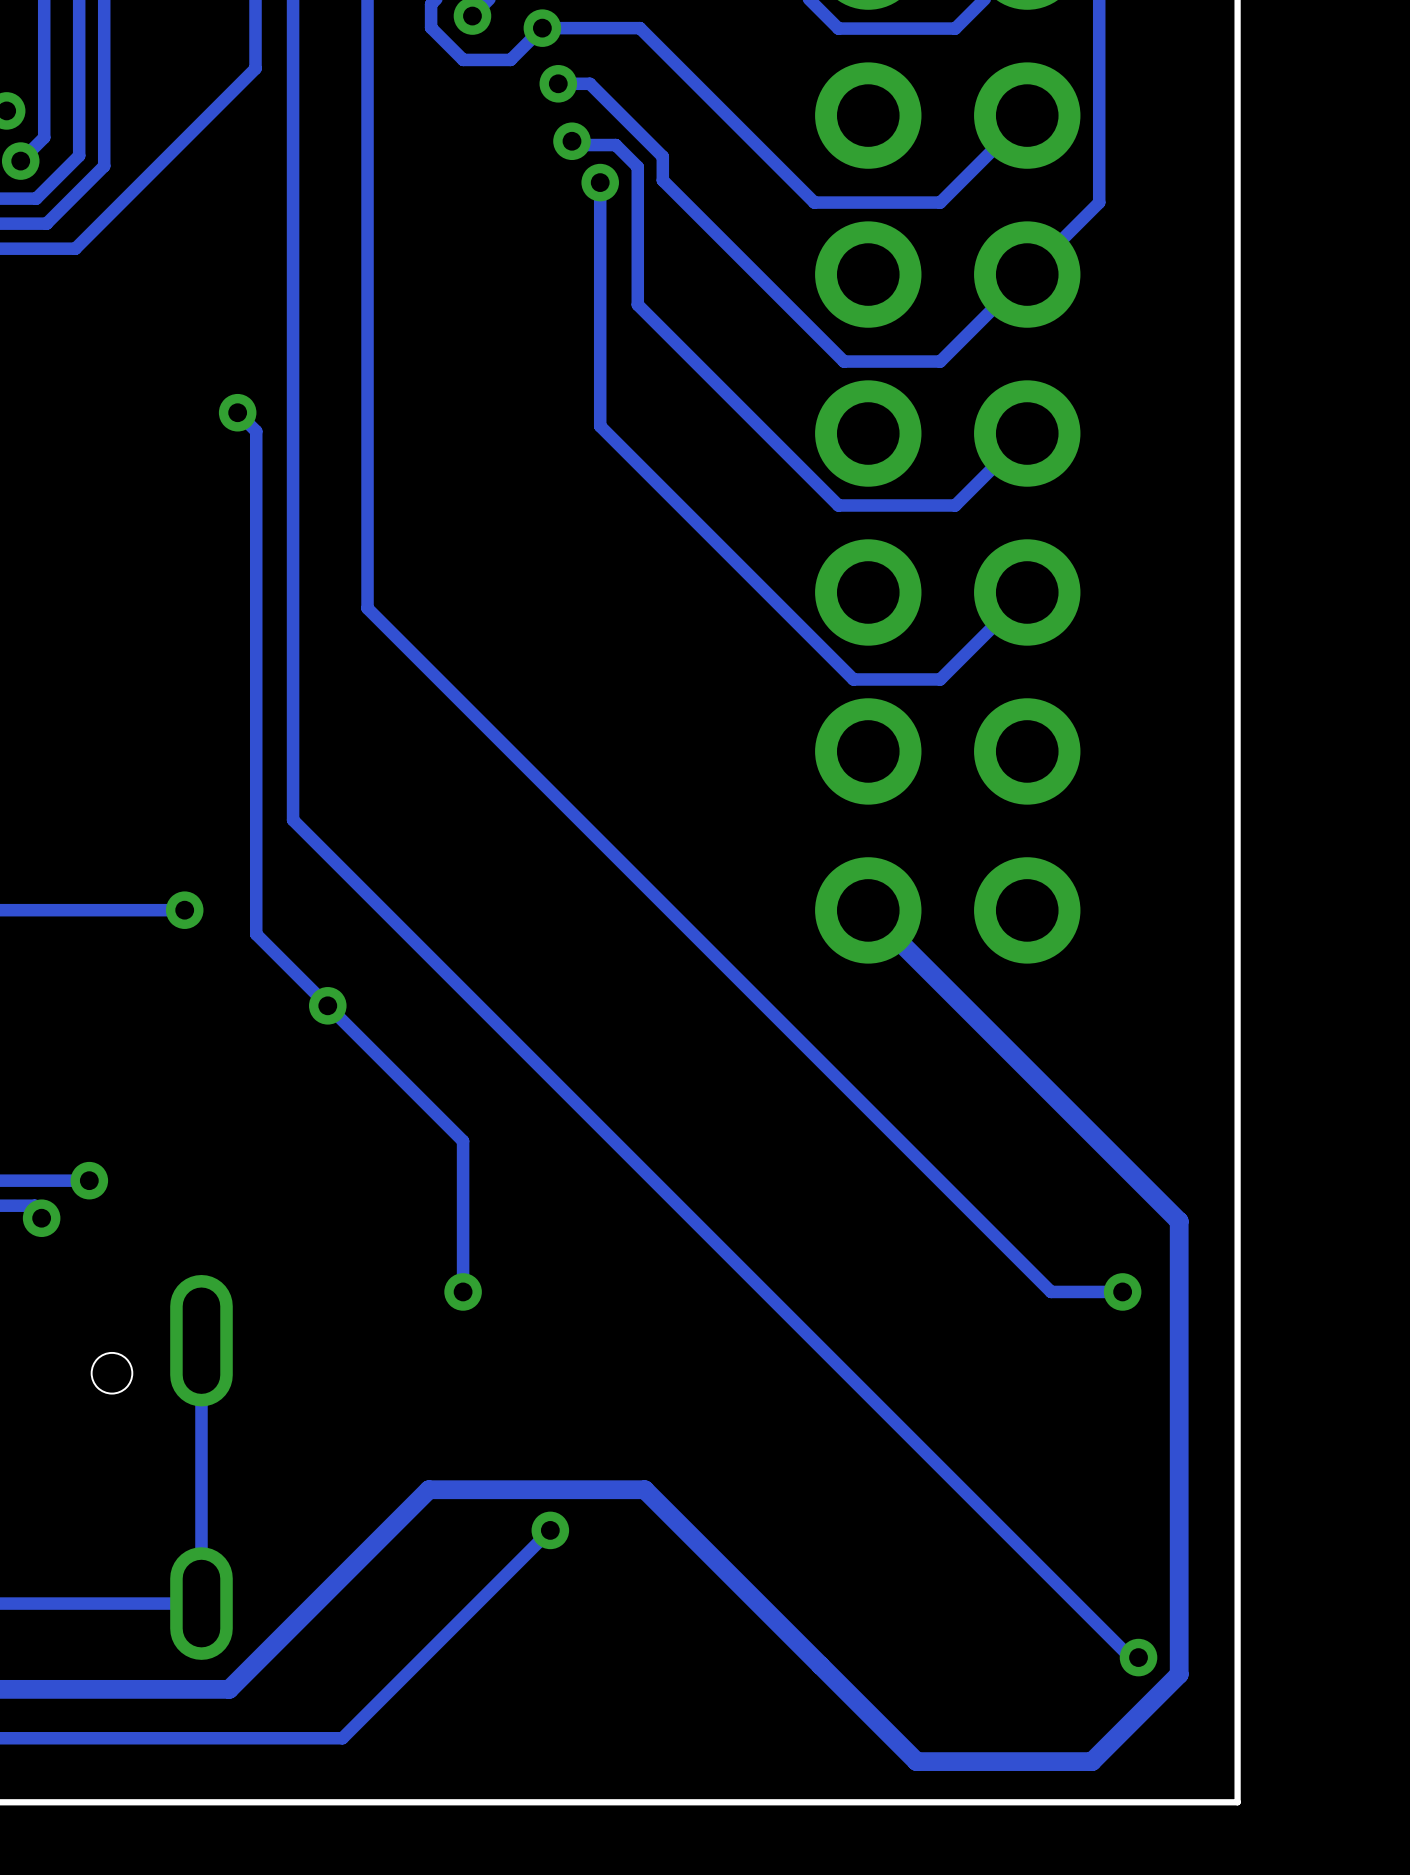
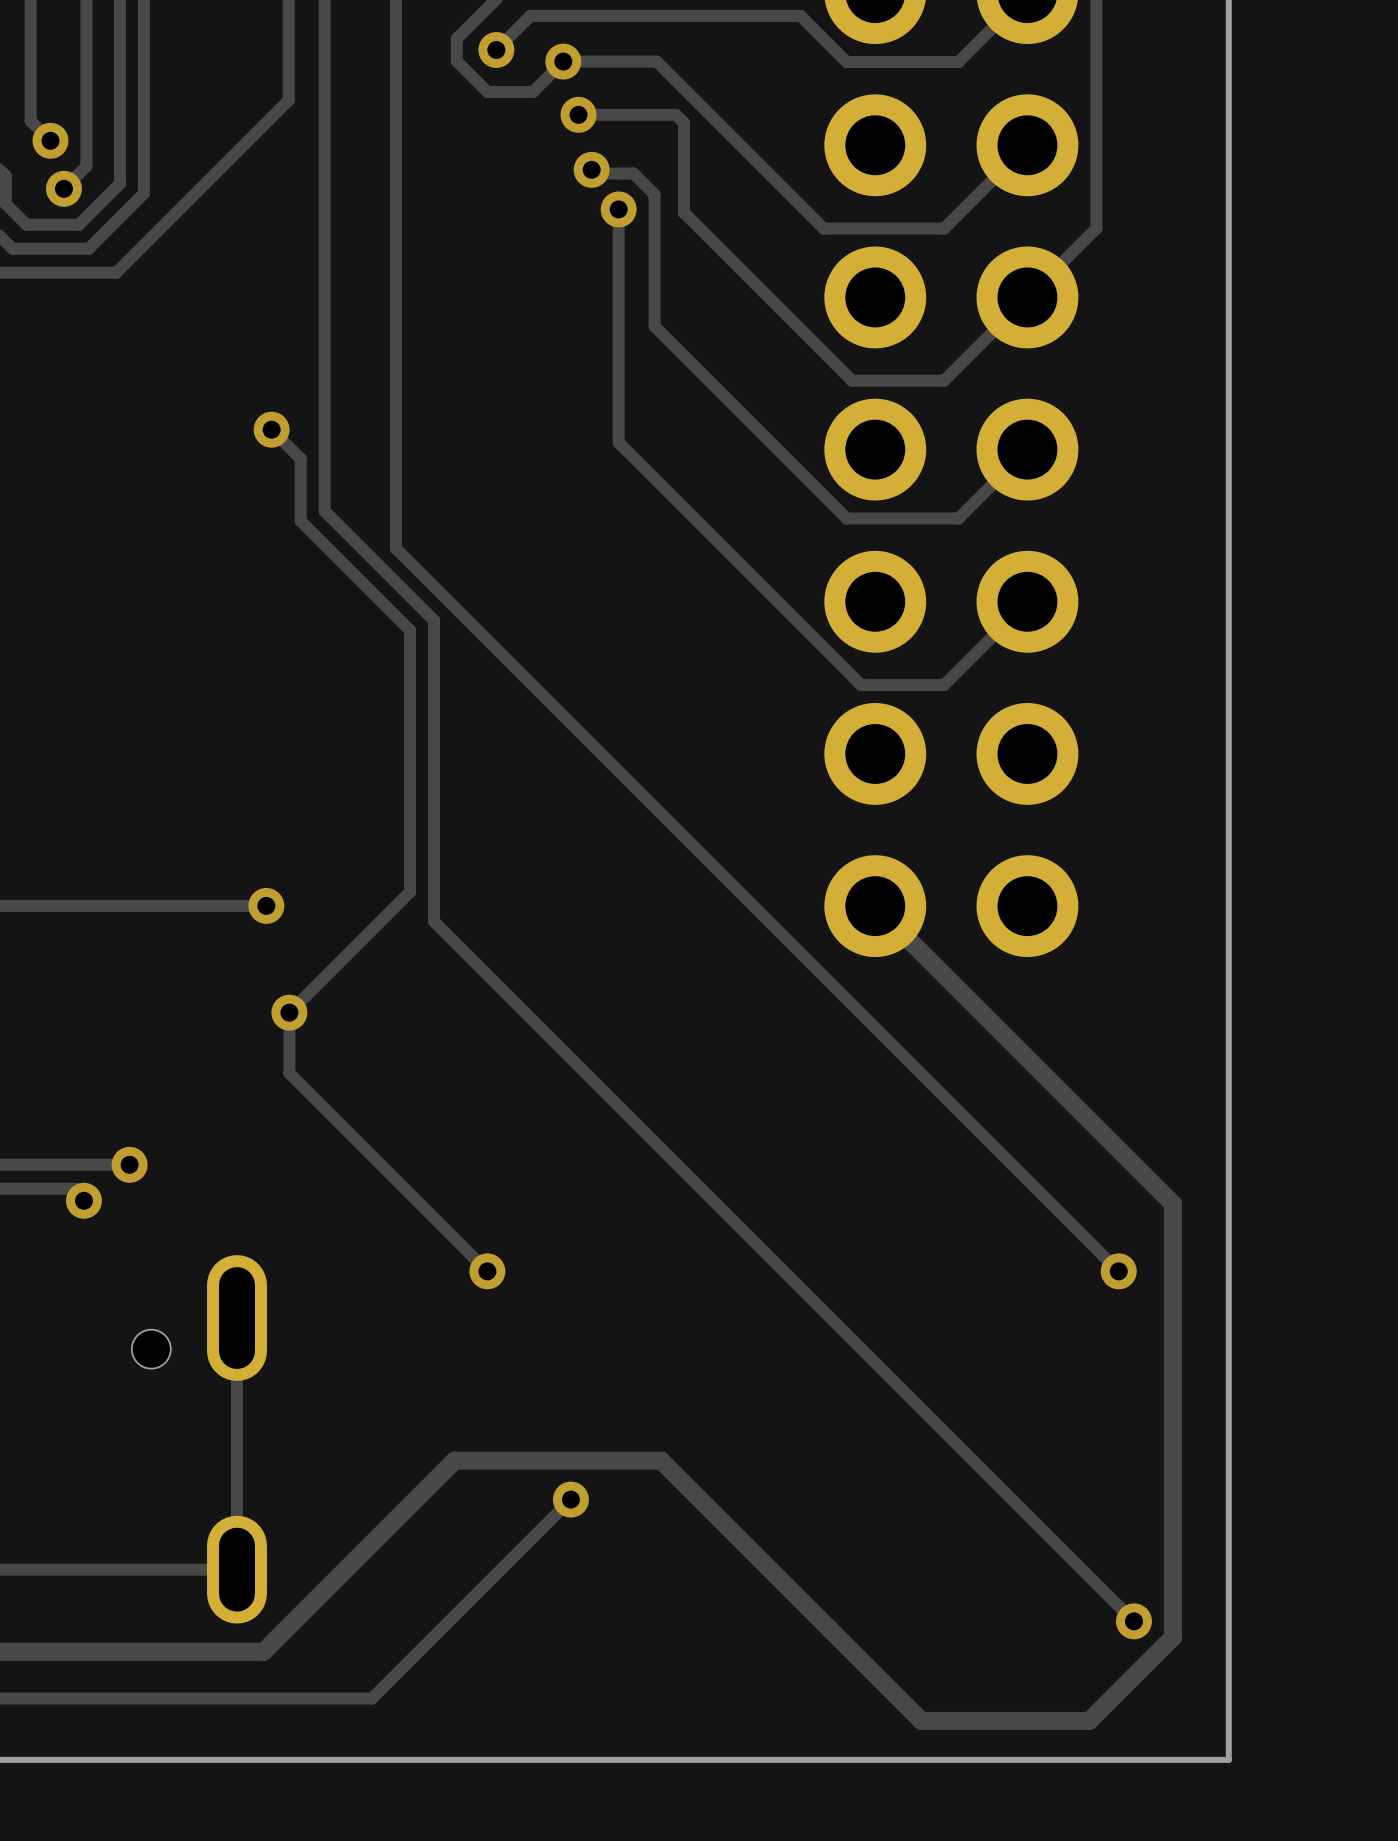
track: (589, 83) (662, 156) (662, 180) (668, 185) -> (608, 114) (676, 114) (683, 122) (683, 212)
track: (256, 431) (256, 934) (463, 1141) (463, 1291) -> (289, 447) (300, 458) (300, 521) (410, 630) (410, 892) (289, 1012) (289, 1073) (487, 1271)
track: (293, 497) (293, 820) (1130, 1657) (1138, 1657) -> (324, 511) (433, 620) (433, 921) (1133, 1621)
track: (367, 536) (367, 608) (1051, 1291) (1122, 1291) -> (395, 548) (1118, 1271)
via position: (184, 910) -> (266, 905)
track: none -> (266, 905) (220, 905)
via: (327, 1005) -> none
via: none -> (289, 1012)

